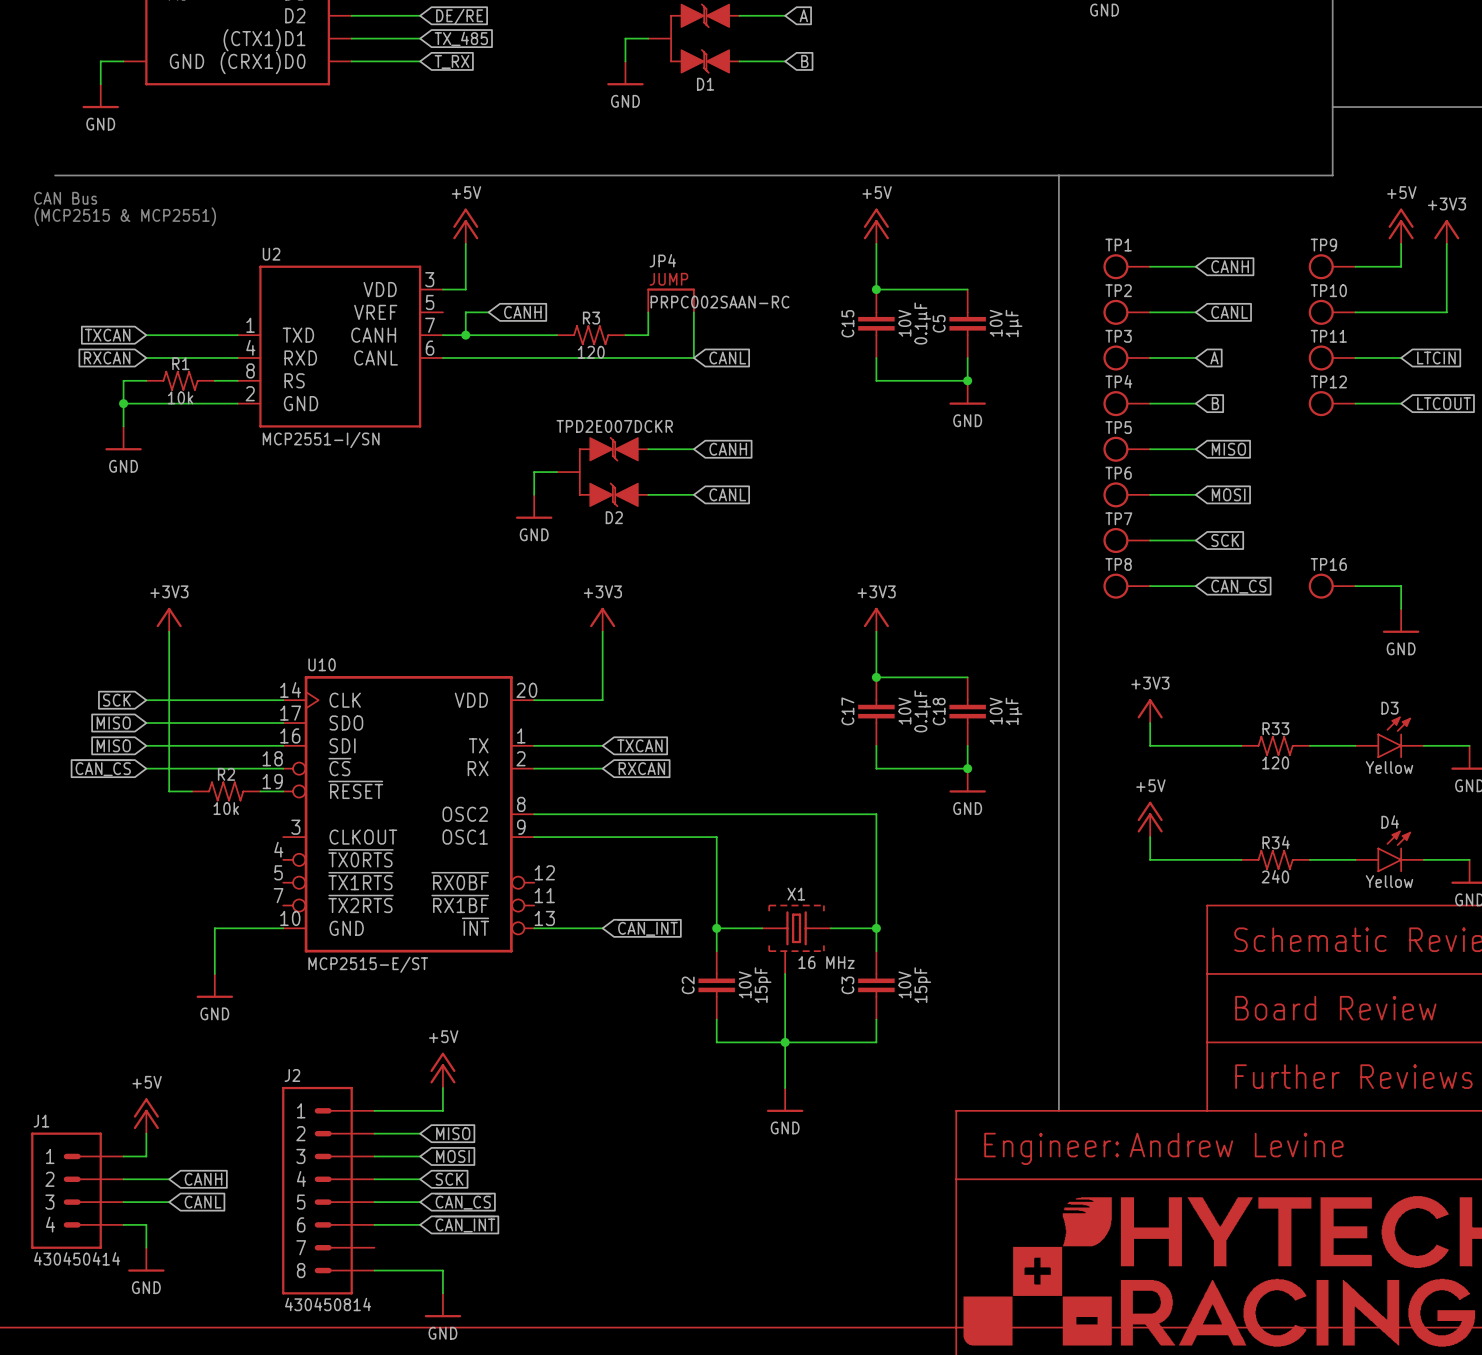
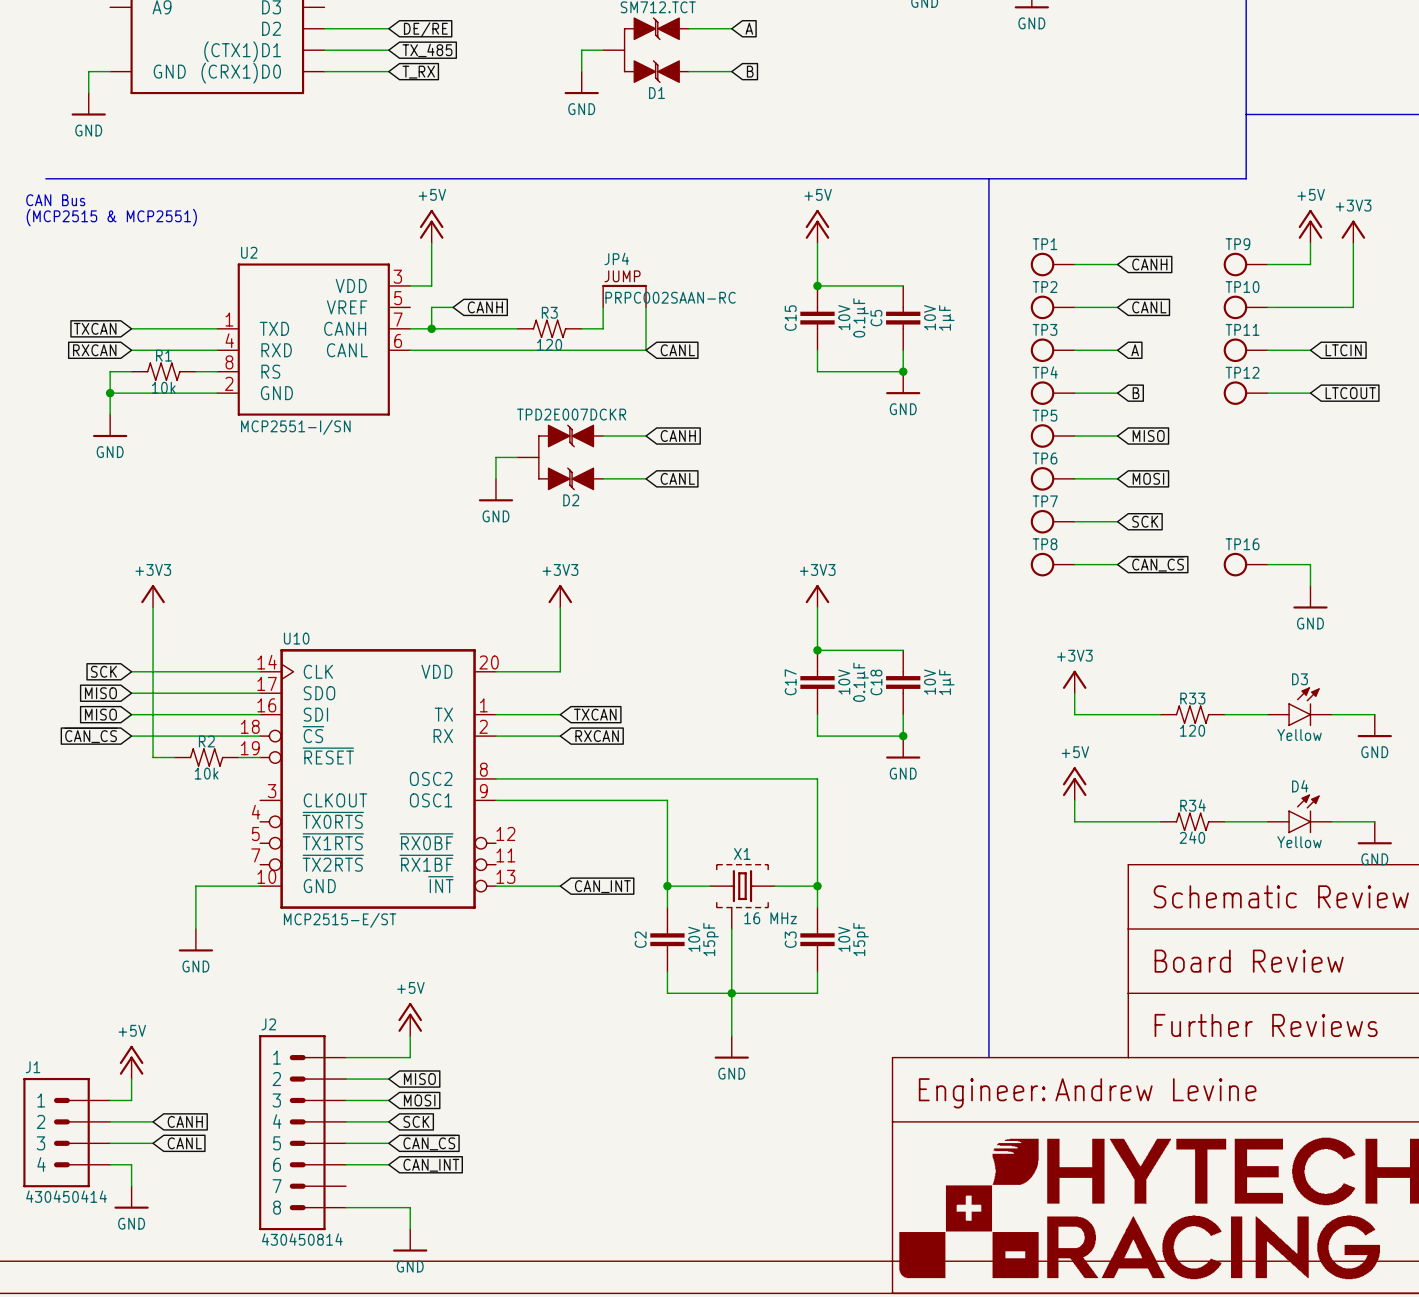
global label: ~{CAN_INT} (647, 927) -> CAN_INT (602, 886)
global label: ~{CAN_INT} (465, 1224) -> CAN_INT (431, 1165)

